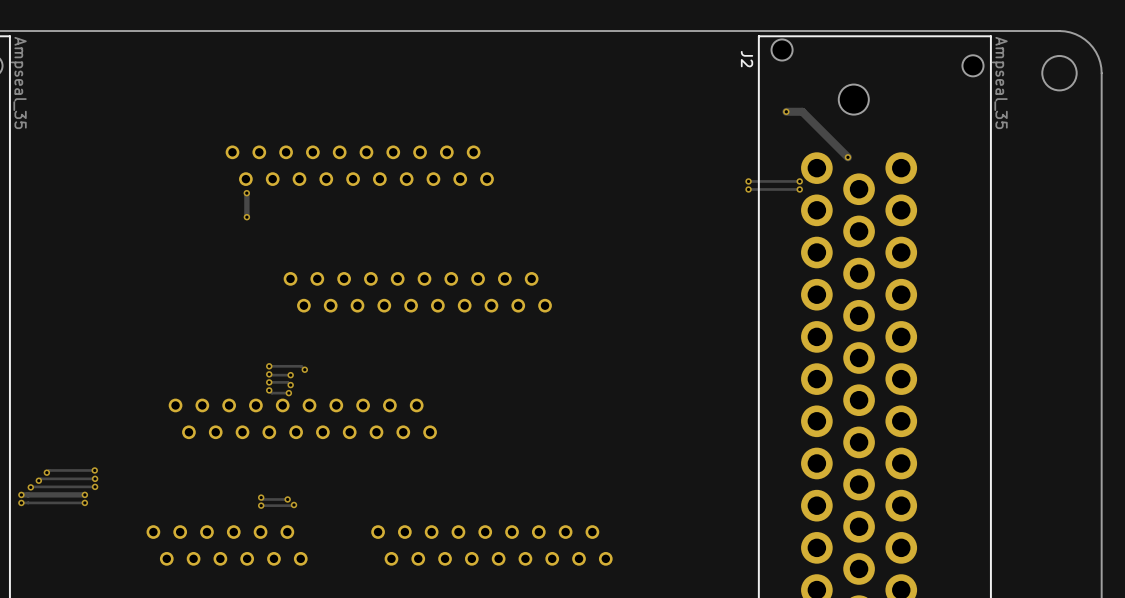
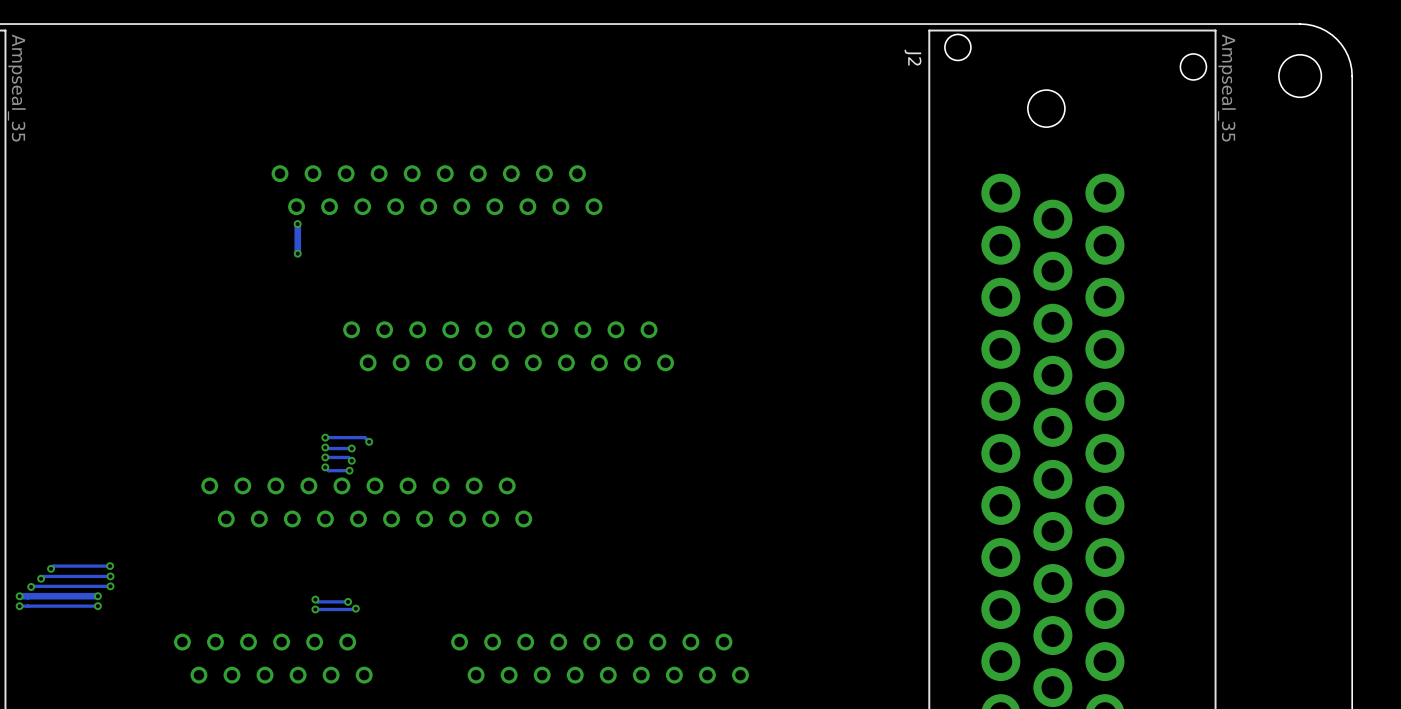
track: (786, 111) (802, 111) (847, 157) -> none
via: (786, 111) -> none
via: (847, 157) -> none
via: (748, 181) -> none
track: (799, 181) (748, 181) -> none
via: (799, 181) -> none
via: (748, 189) -> none
track: (799, 189) (748, 189) -> none
via: (799, 189) -> none

